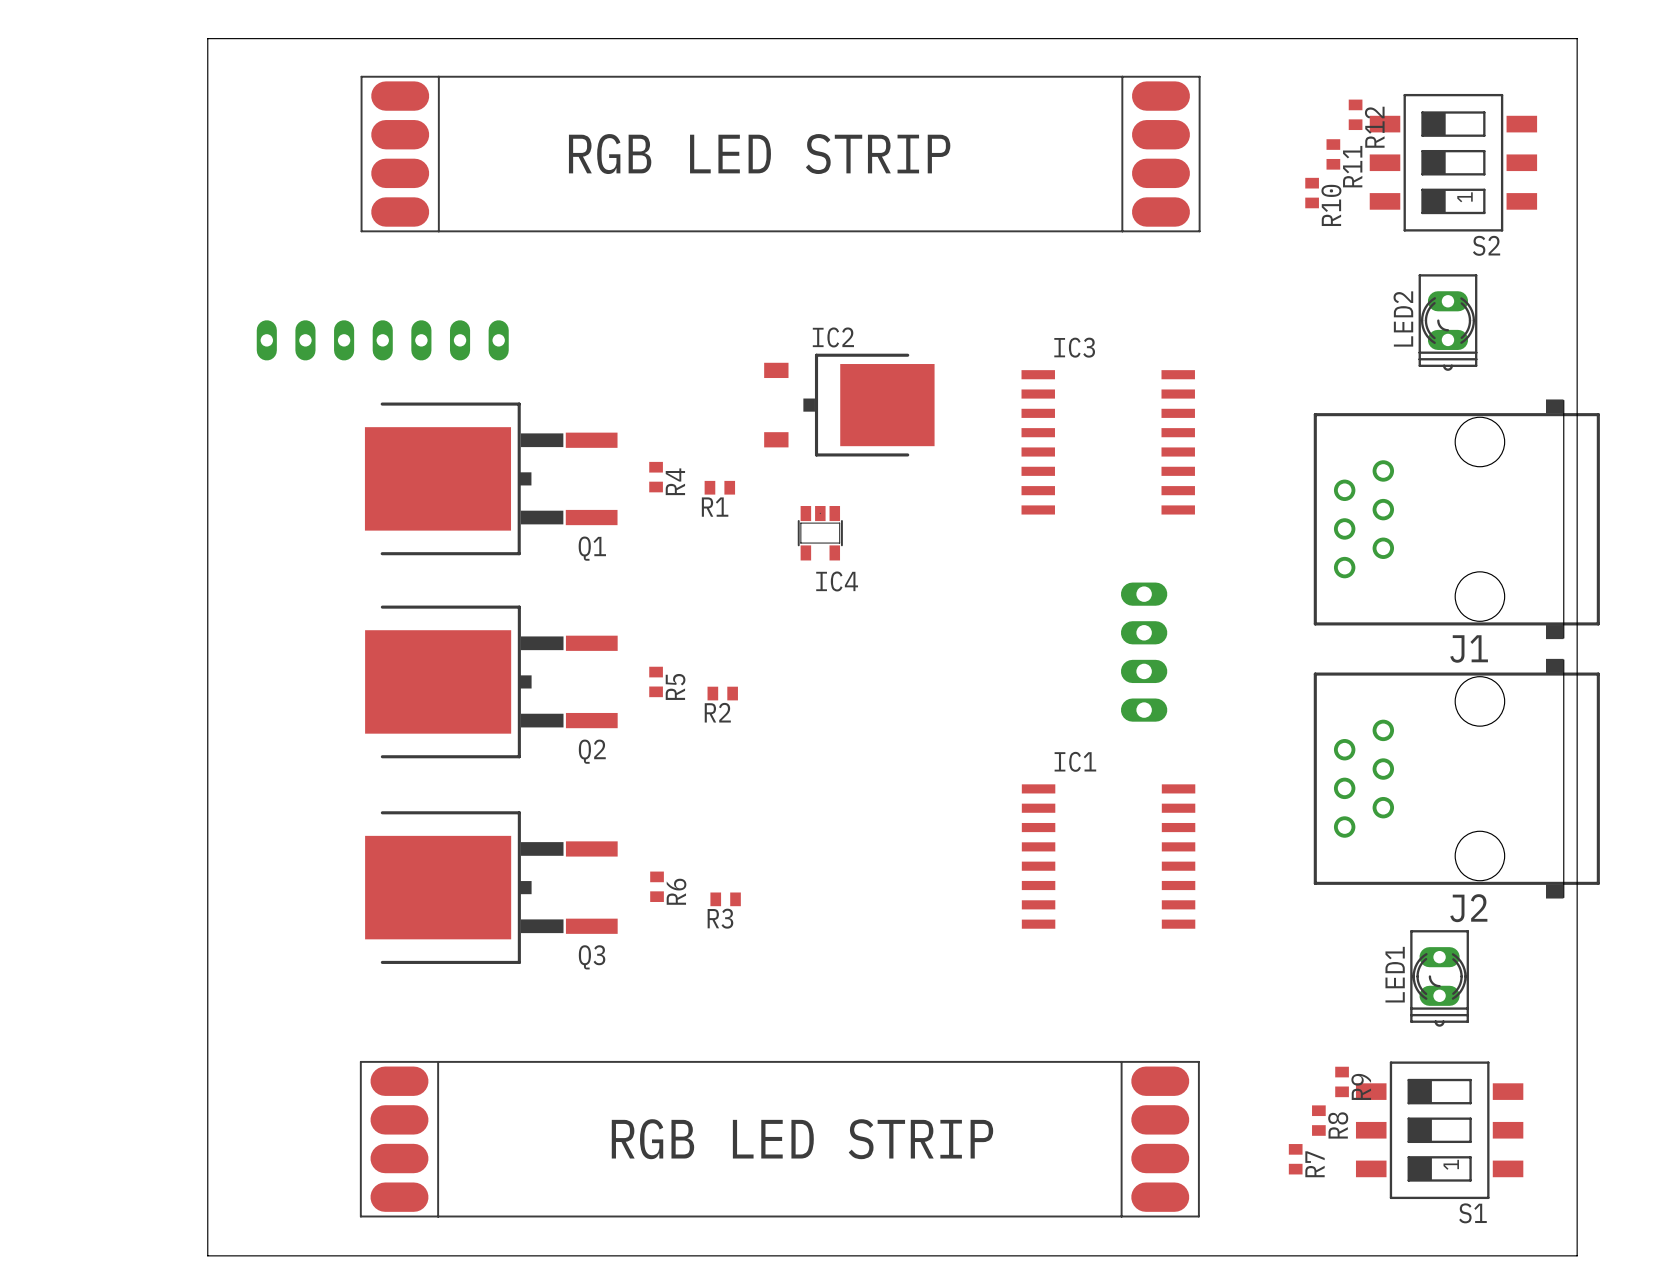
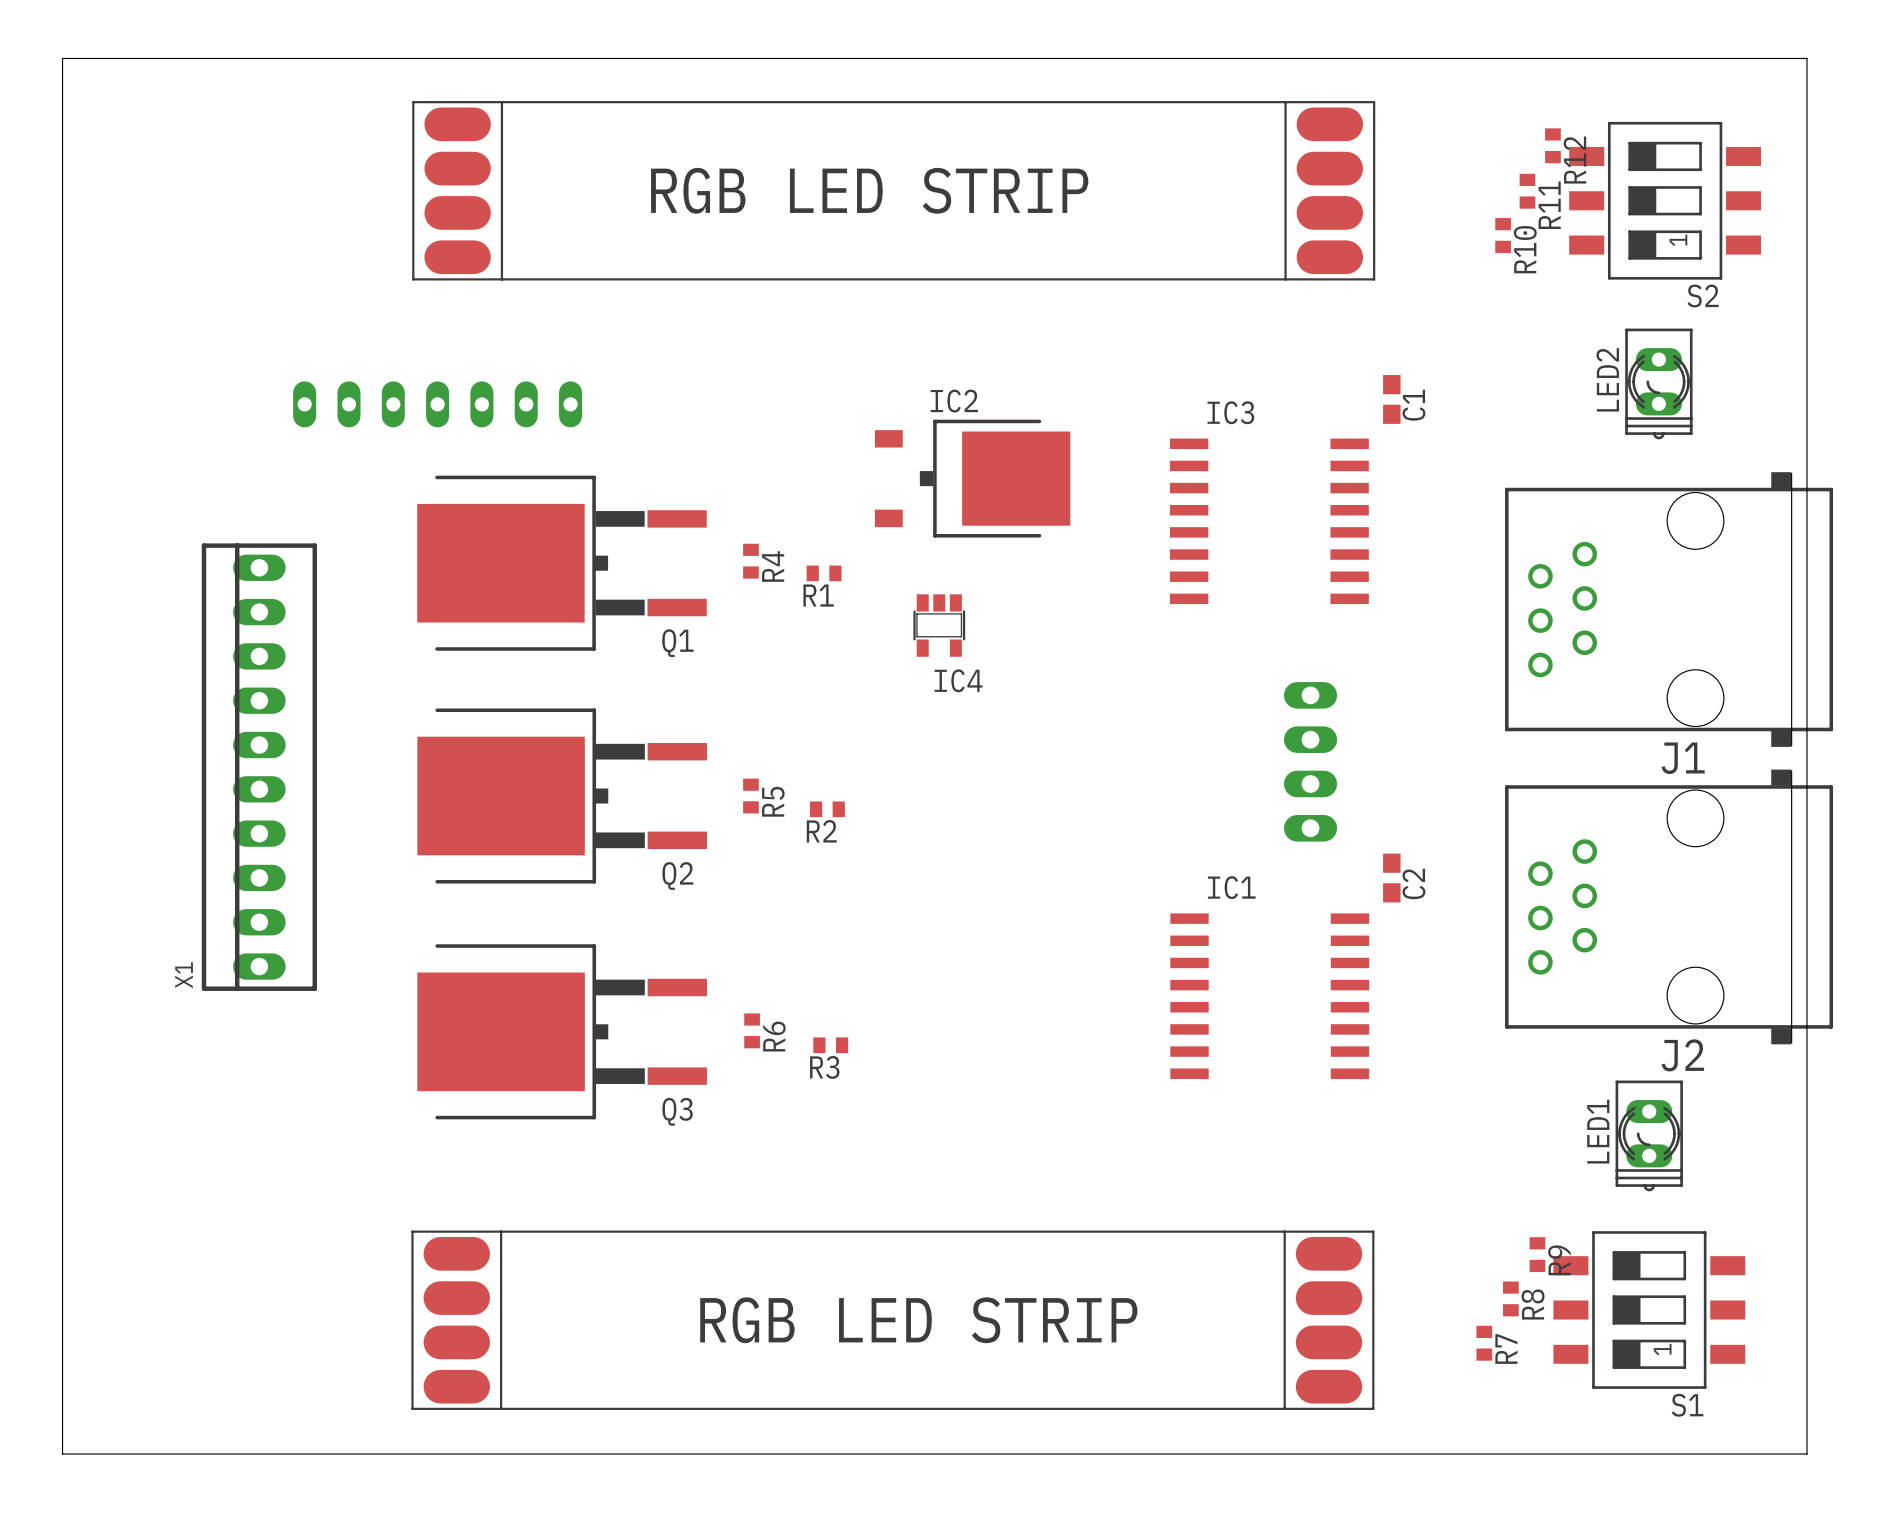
board edge: (207, 38) (207, 1255) -> (236, 58) (62, 58) (62, 1454) (236, 1454)
C1: none -> (1391, 399)
X1: none -> (259, 767)
C2: none -> (1391, 878)

